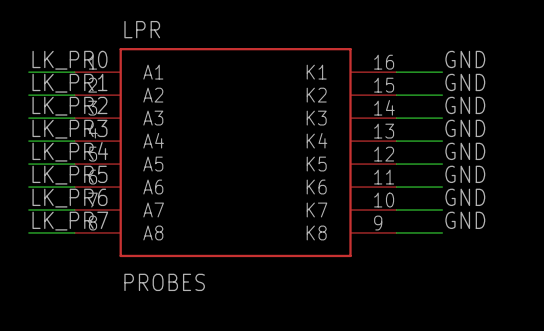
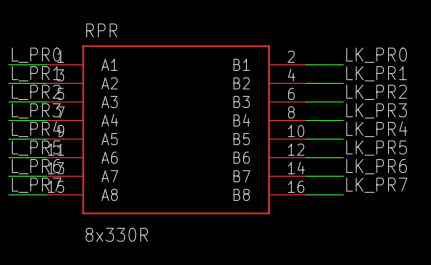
LPR name: LPR (142, 29) -> RPR (101, 30)
LPR symbol: [74, 48, 397, 258] -> [46, 45, 307, 215]
label: GND (465, 59) -> LK_PR0 (376, 55)
label: LK_PR0 (69, 60) -> L_PR0 (36, 55)
label: GND (465, 82) -> LK_PR1 (376, 73)
label: LK_PR1 (69, 83) -> L_PR1 (36, 73)
label: GND (465, 105) -> LK_PR2 (376, 92)
label: LK_PR2 (69, 106) -> L_PR2 (36, 92)
label: GND (465, 128) -> LK_PR3 (376, 110)
label: LK_PR3 (69, 129) -> L_PR3 (36, 110)
label: LK_PR4 (70, 151) -> L_PR4 (36, 129)
label: GND (465, 151) -> LK_PR4 (376, 129)
label: GND (465, 174) -> LK_PR5 (376, 148)
label: LK_PR5 (69, 175) -> L_PR5 (36, 148)
label: GND (465, 197) -> LK_PR6 (376, 166)
label: LK_PR6 (69, 198) -> L_PR6 (36, 166)
label: GND (465, 220) -> LK_PR7 (376, 185)
label: LK_PR7 (70, 221) -> L_PR7 (36, 185)
LPR value: PROBES (164, 282) -> 8x330R (116, 234)

